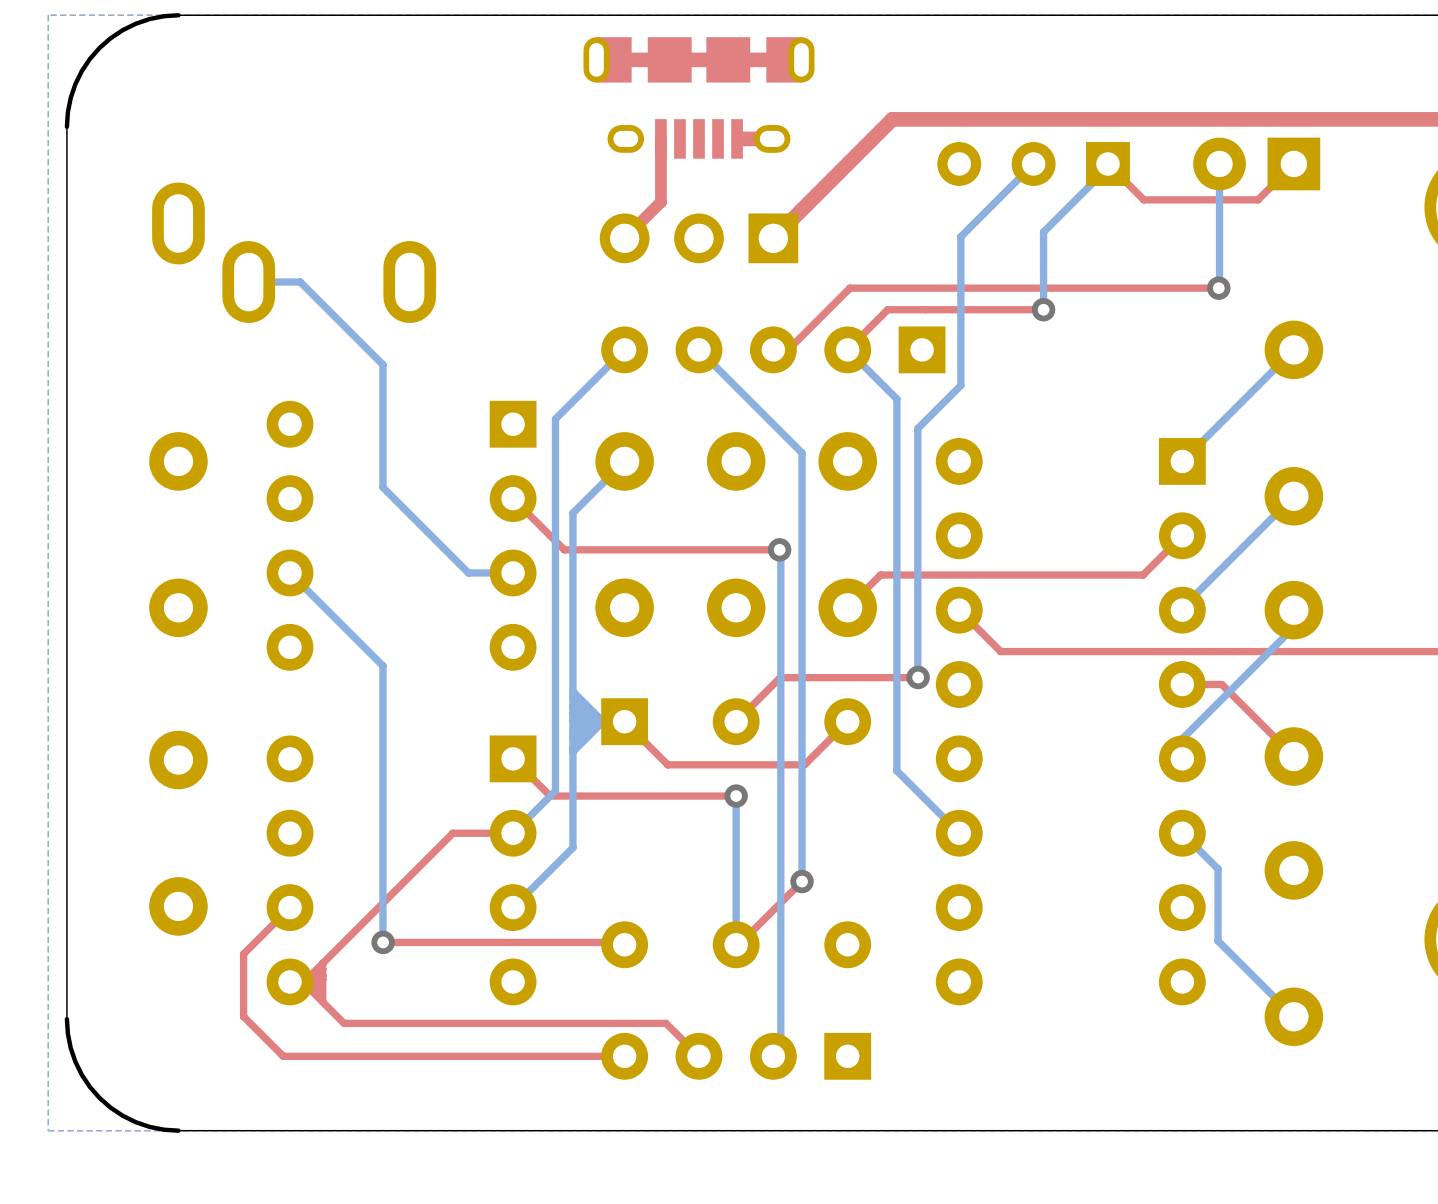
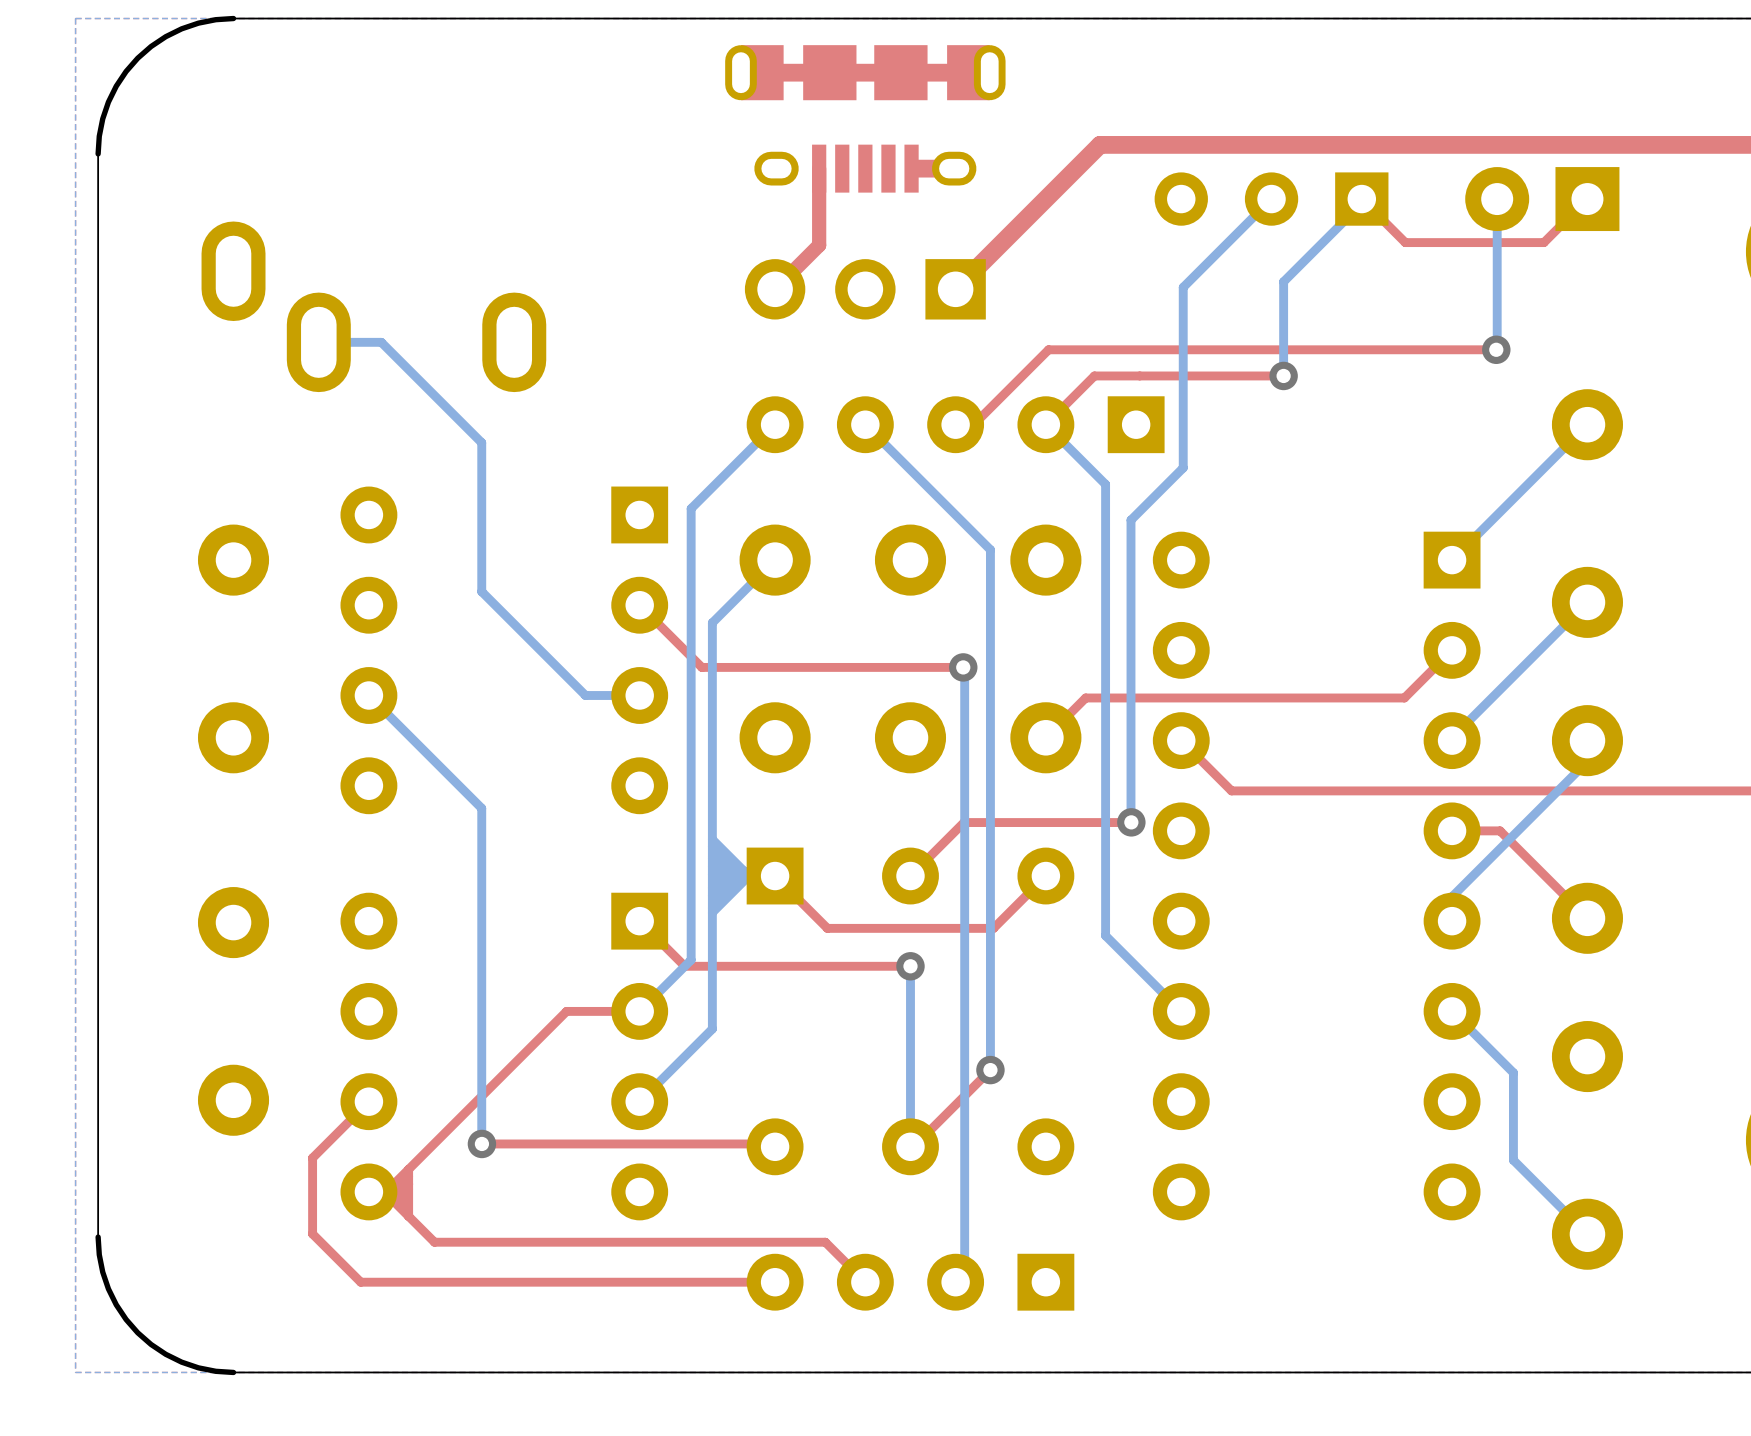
bottom track: (1218, 868) (1218, 940) (1232, 955) -> (1495, 1054) (1513, 1072) (1513, 1160)

